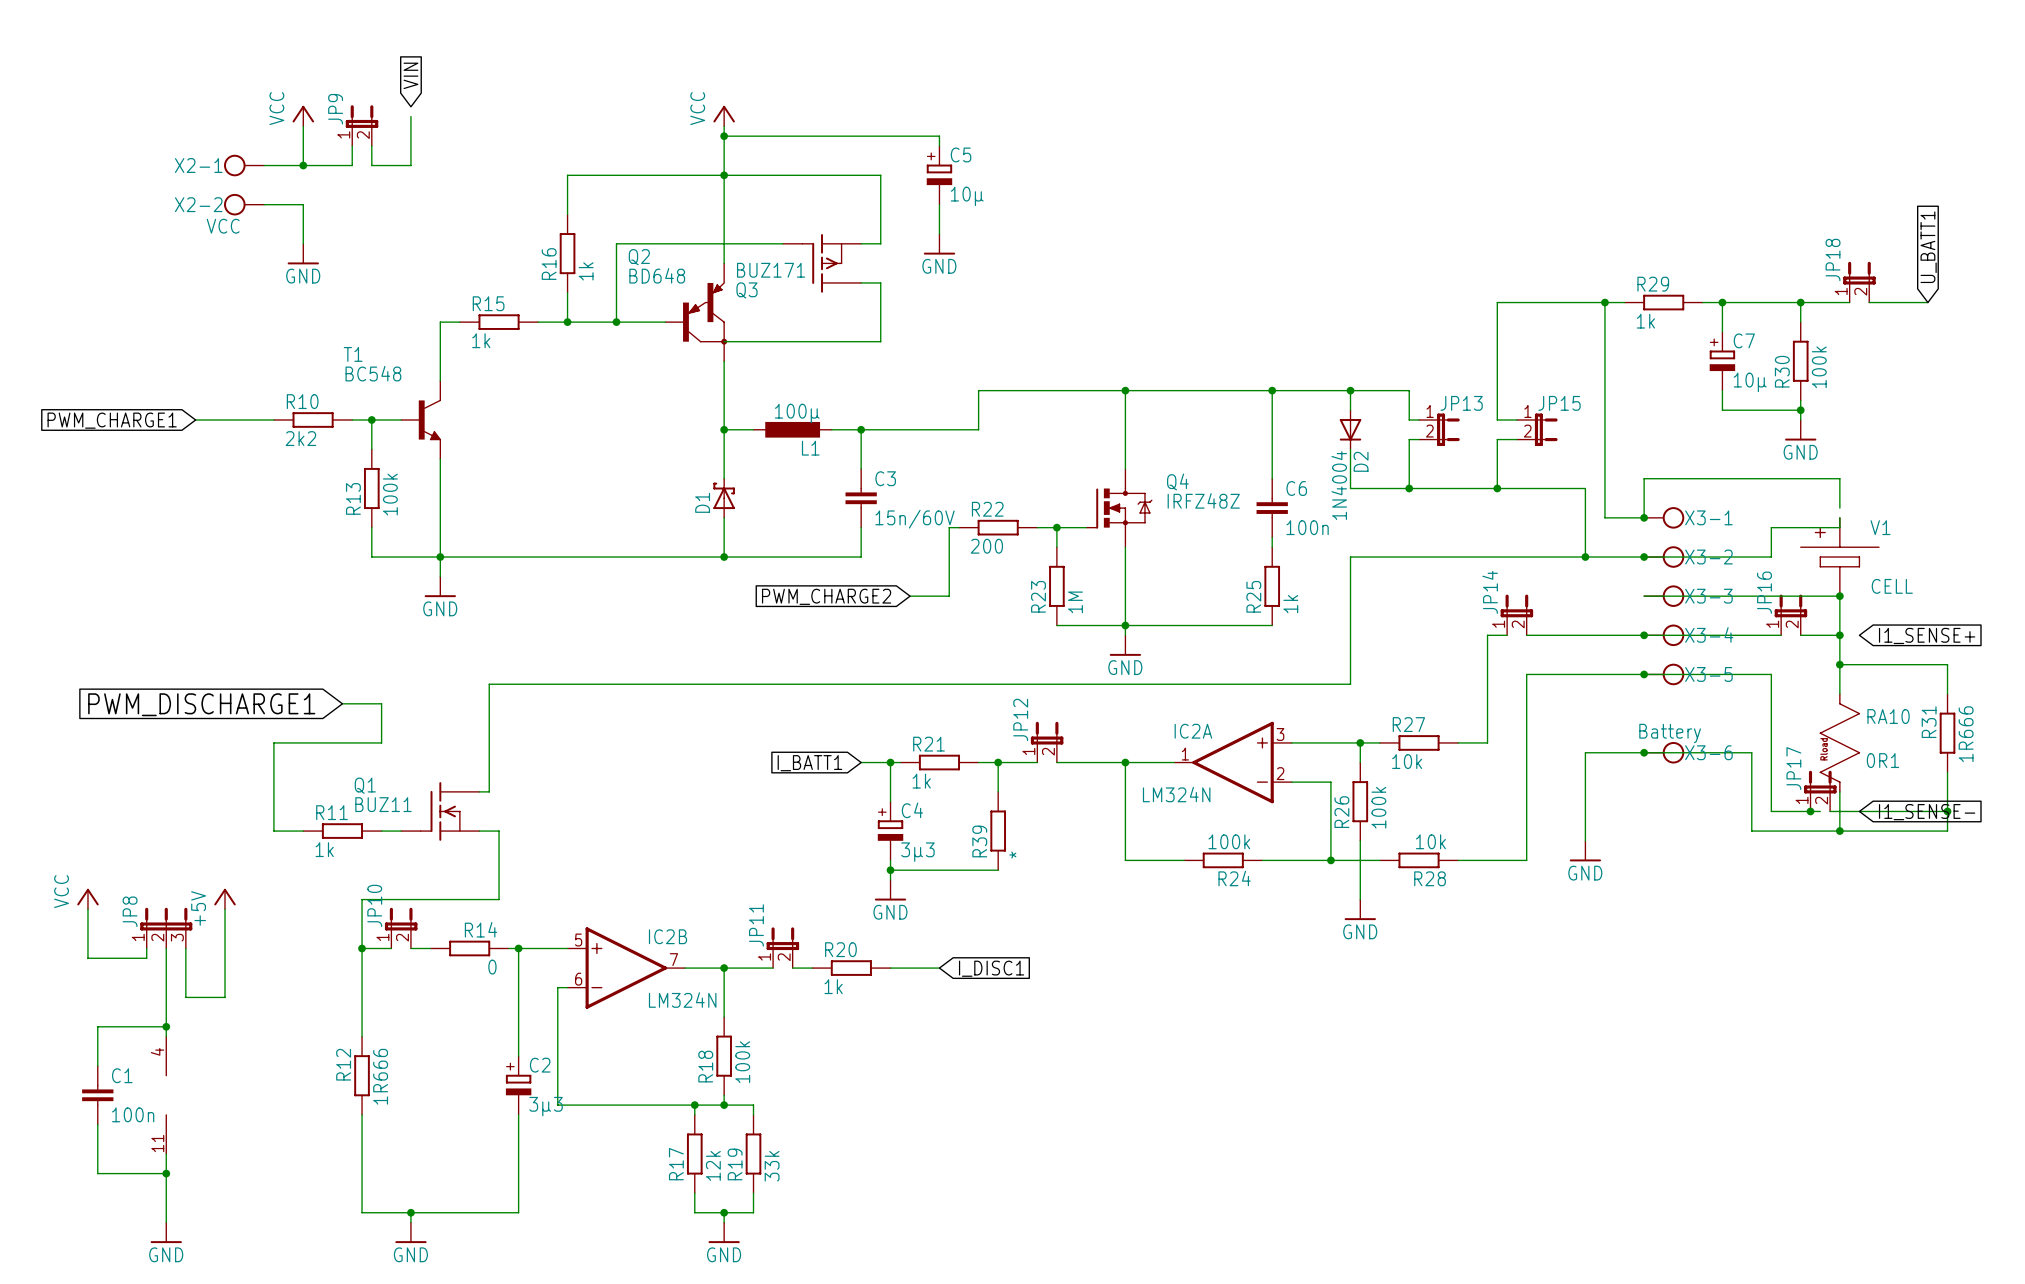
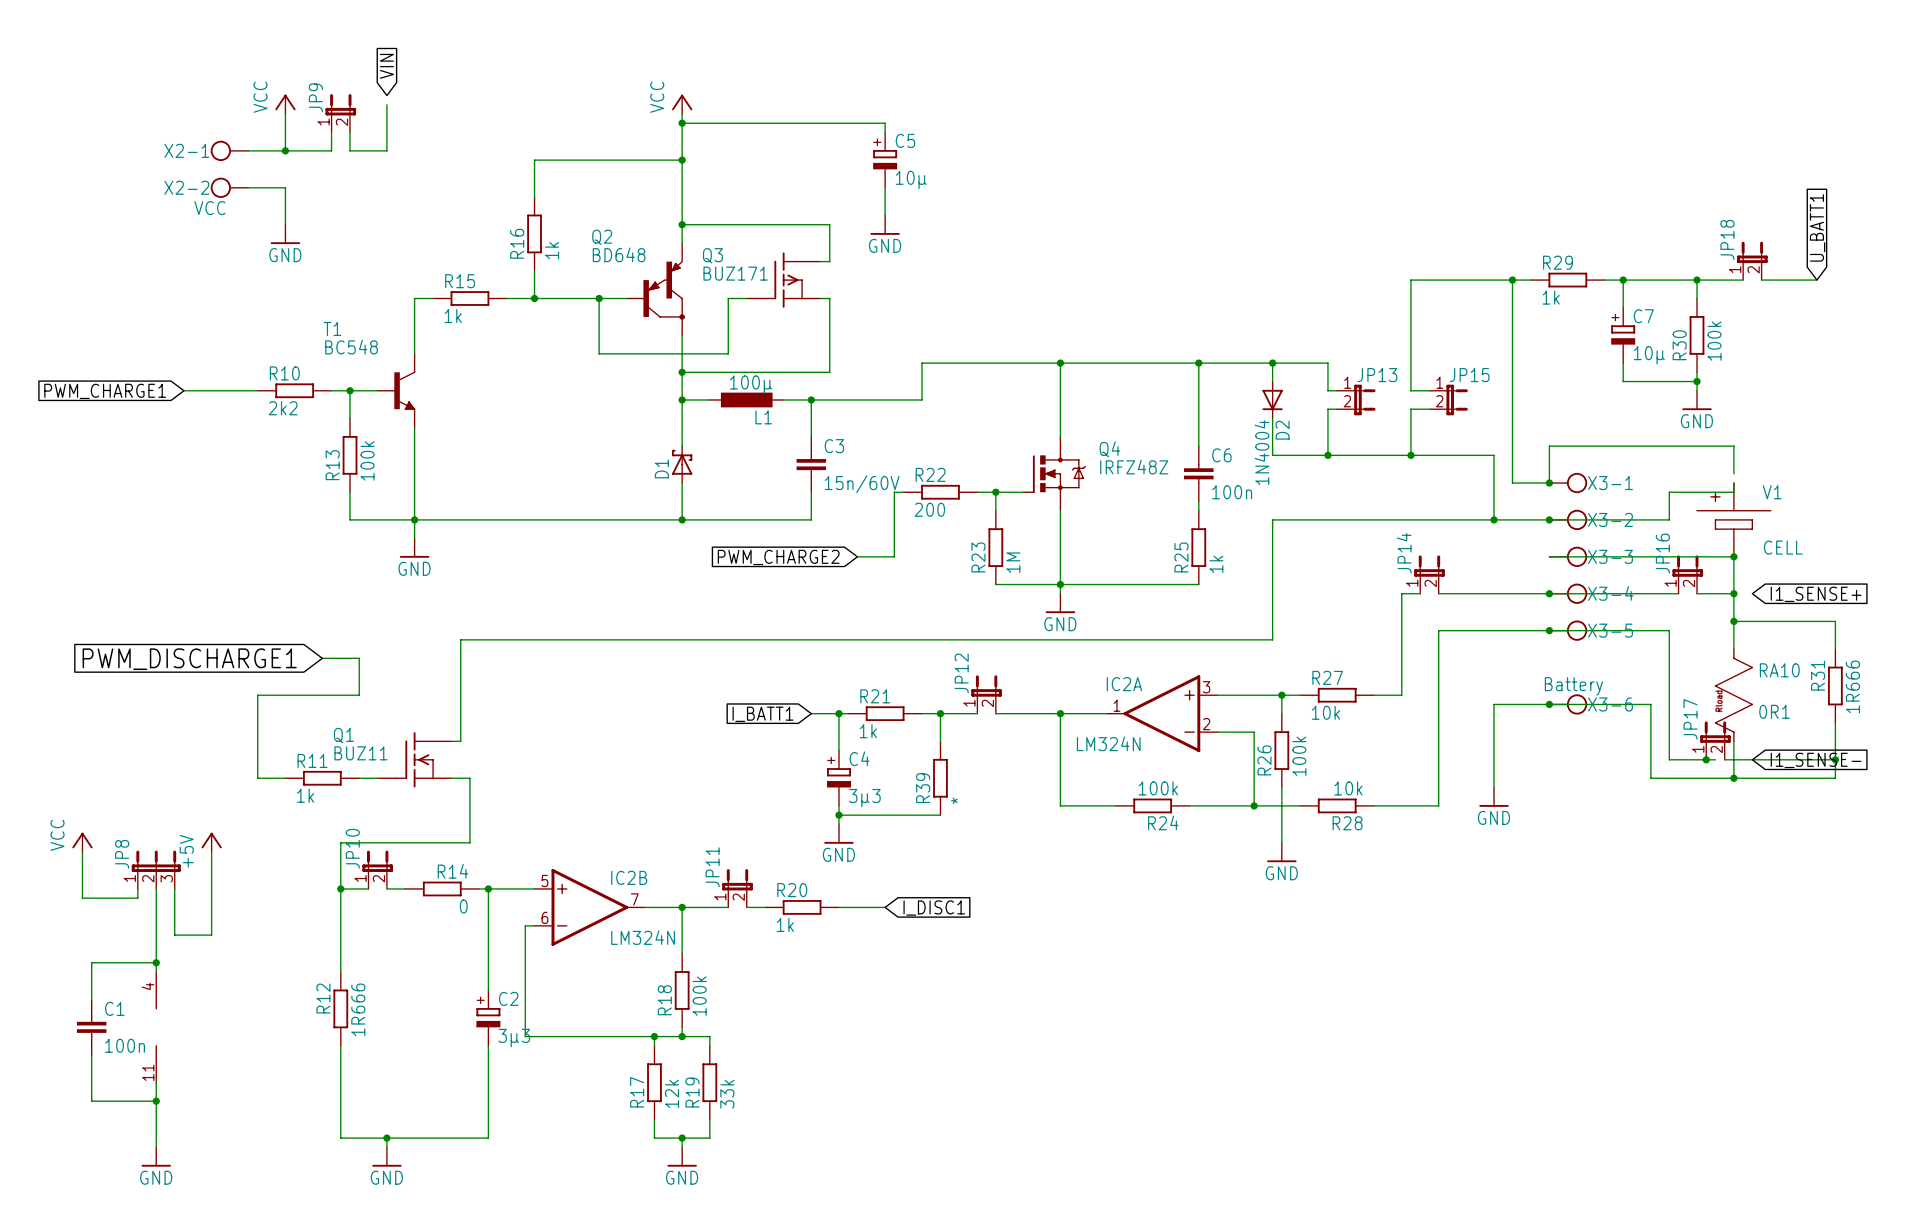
wire: (724, 175) (880, 175) (880, 243) -> (829, 261) (829, 224)
wire: (724, 243) (616, 243) (616, 322) -> none
junction: none -> (682, 224)
Q3 flip: as is (822, 263) -> up-down (783, 280)
wire: (880, 282) (880, 322) -> (820, 298) (829, 298)
junction position: (616, 322) -> (599, 298)
wire: none -> (599, 298) (599, 353) (728, 353) (728, 298) (746, 298)
wire: (724, 341) (880, 341) -> (682, 372) (829, 372) (829, 316)
junction: none -> (682, 372)

